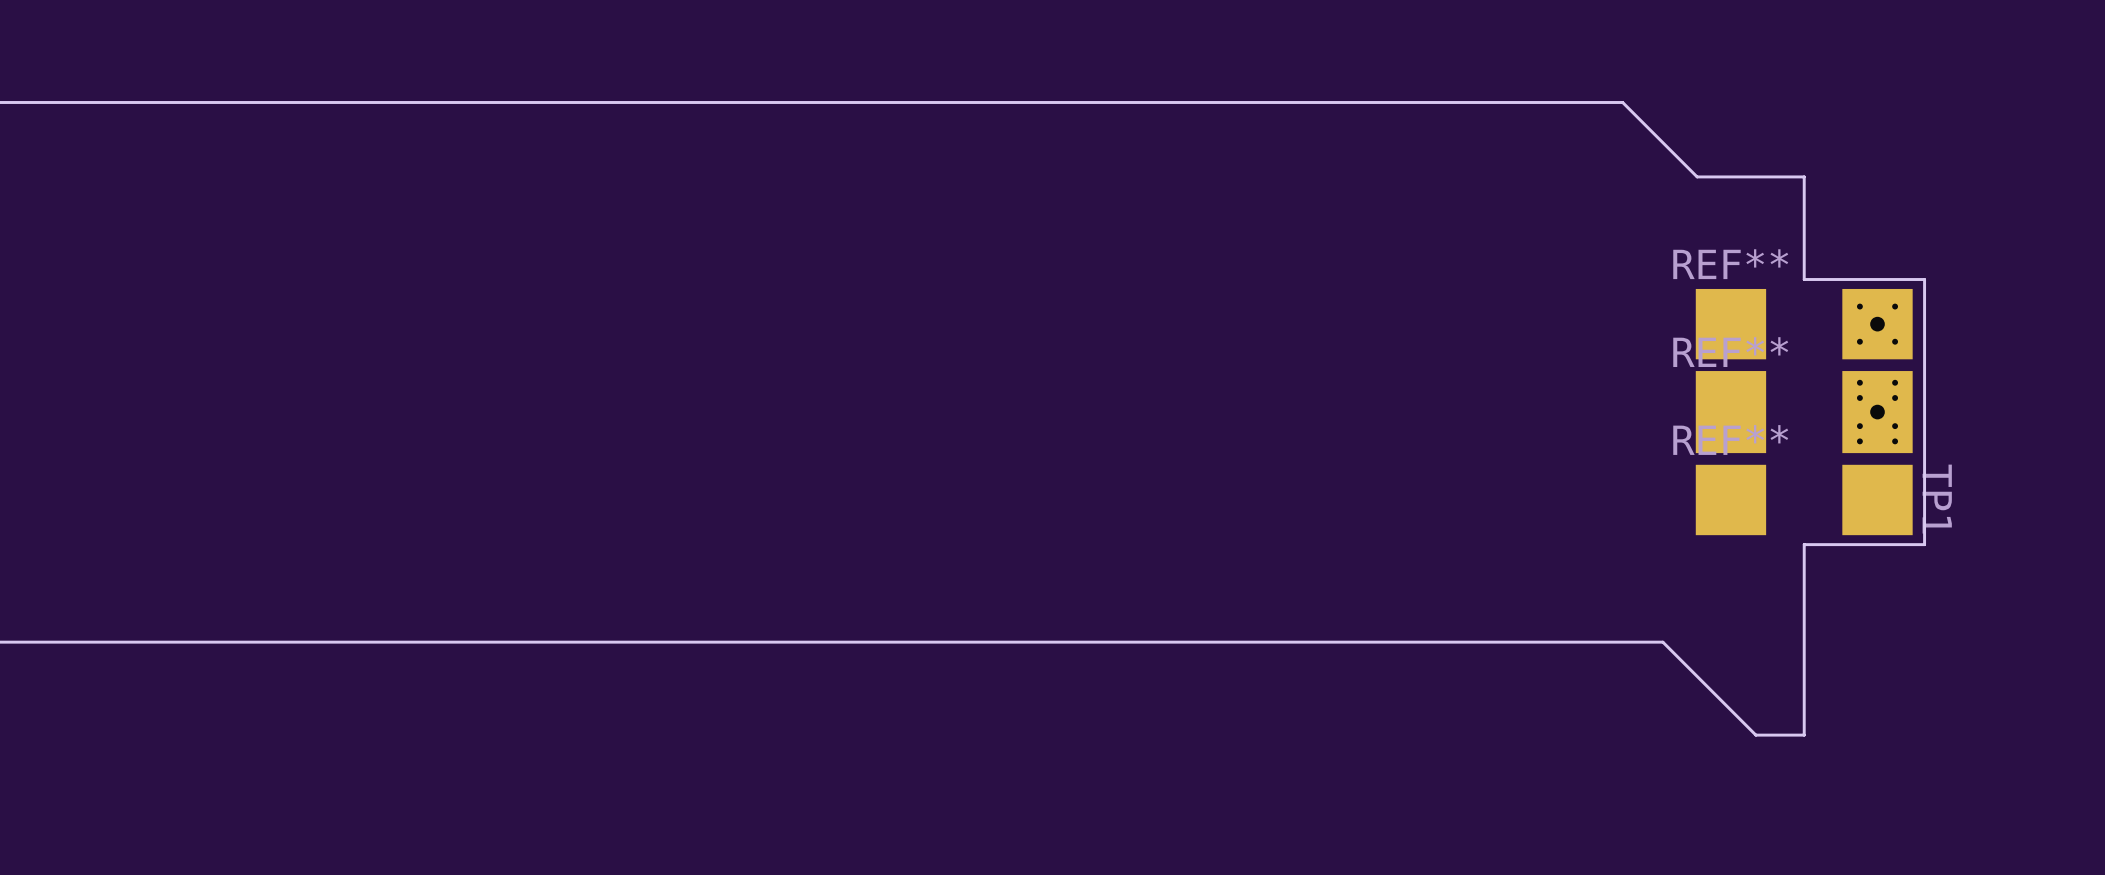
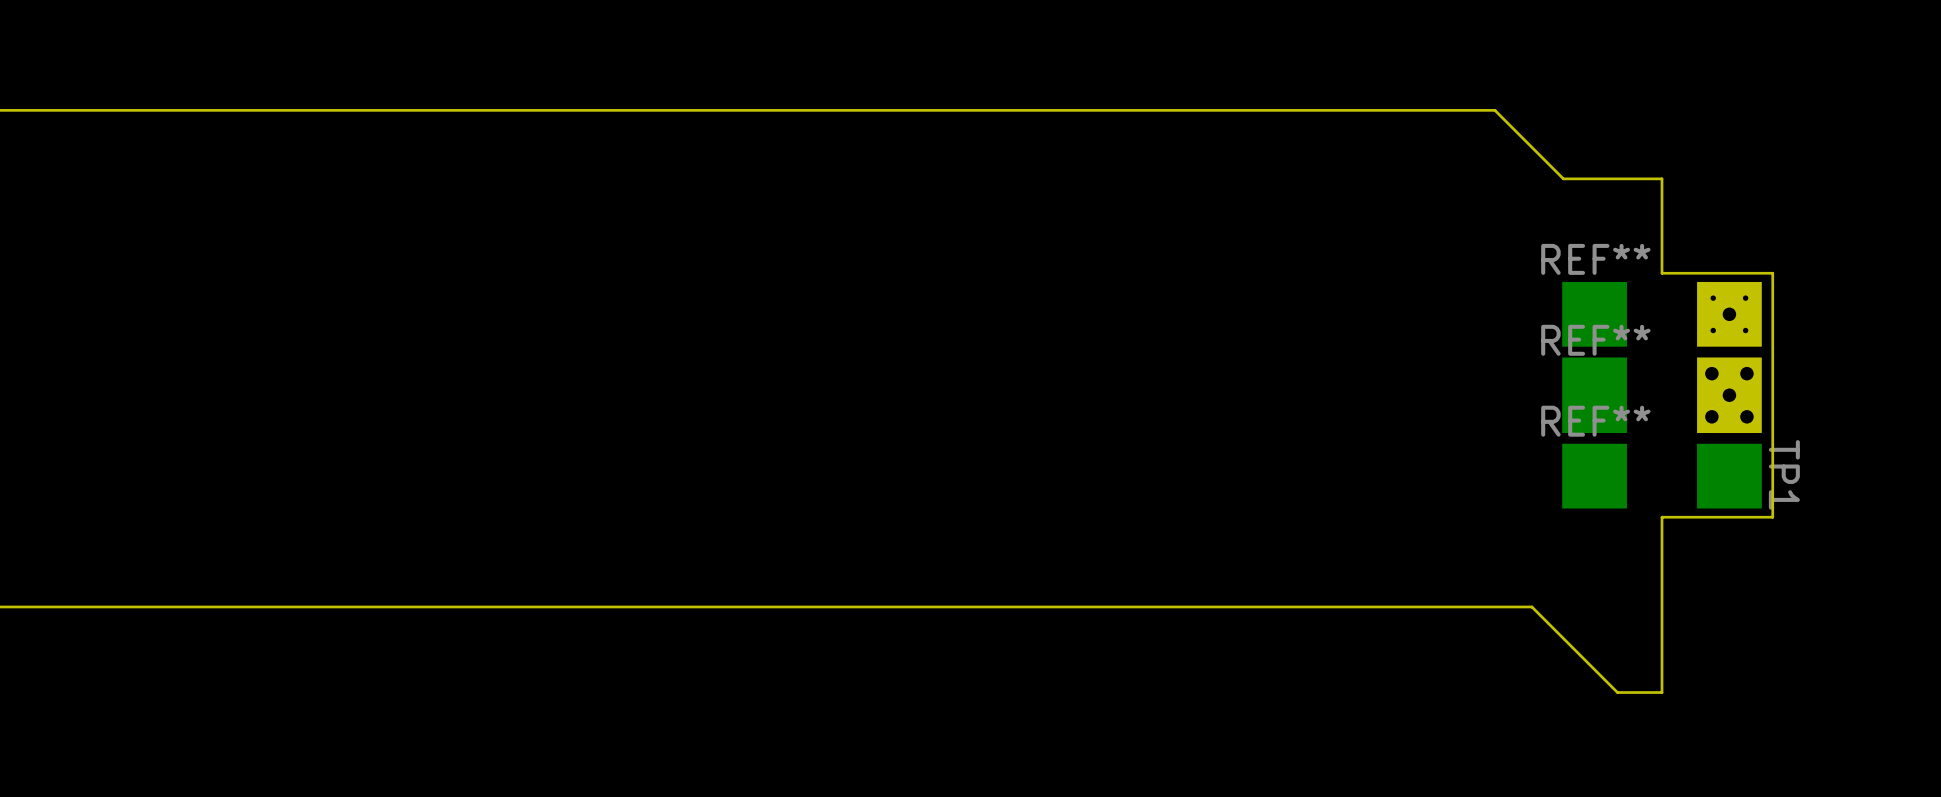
part footprint: [1842, 371, 1913, 454] -> [1697, 357, 1762, 433]

